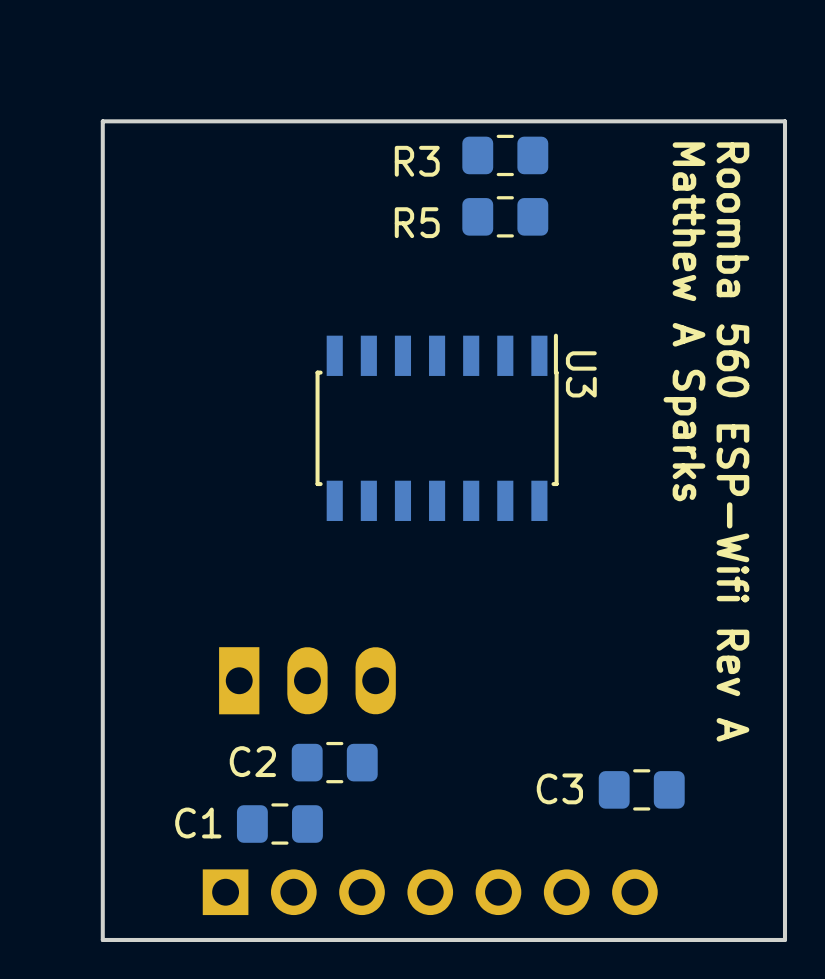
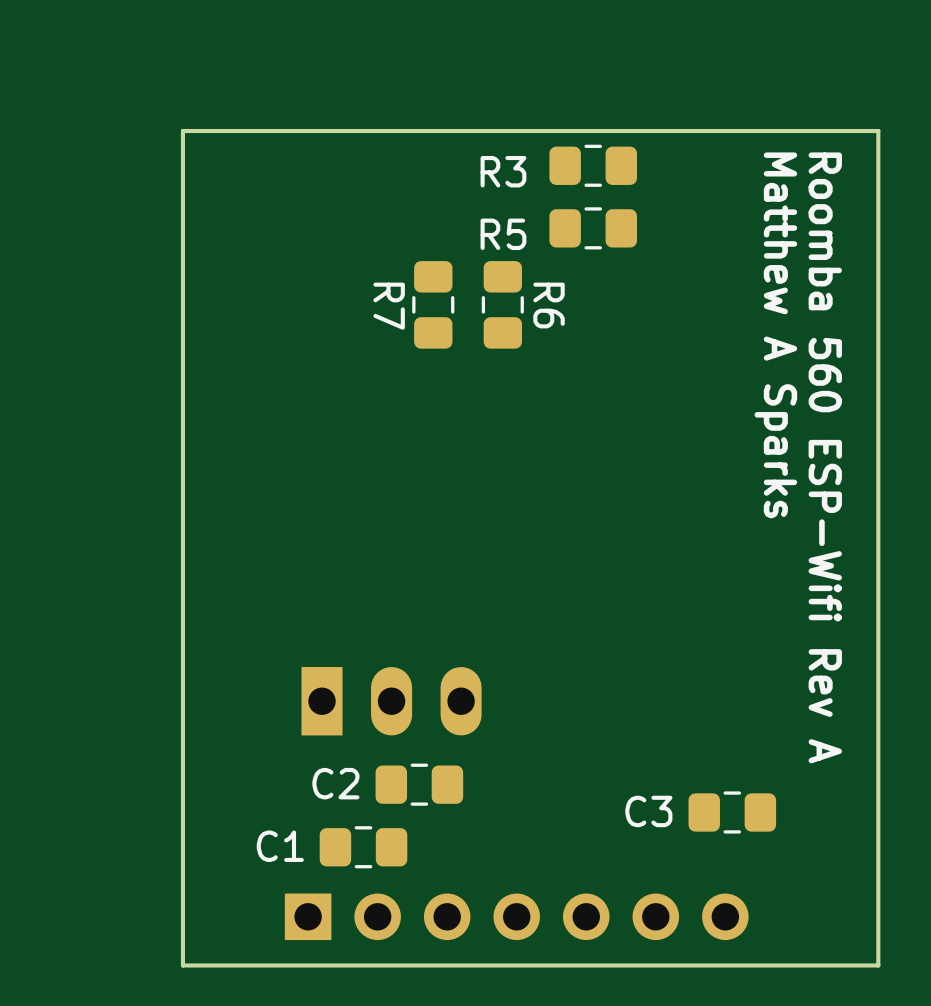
R7: none -> (433, 304)
R6: none -> (502, 304)
U3: (437, 427) -> none

